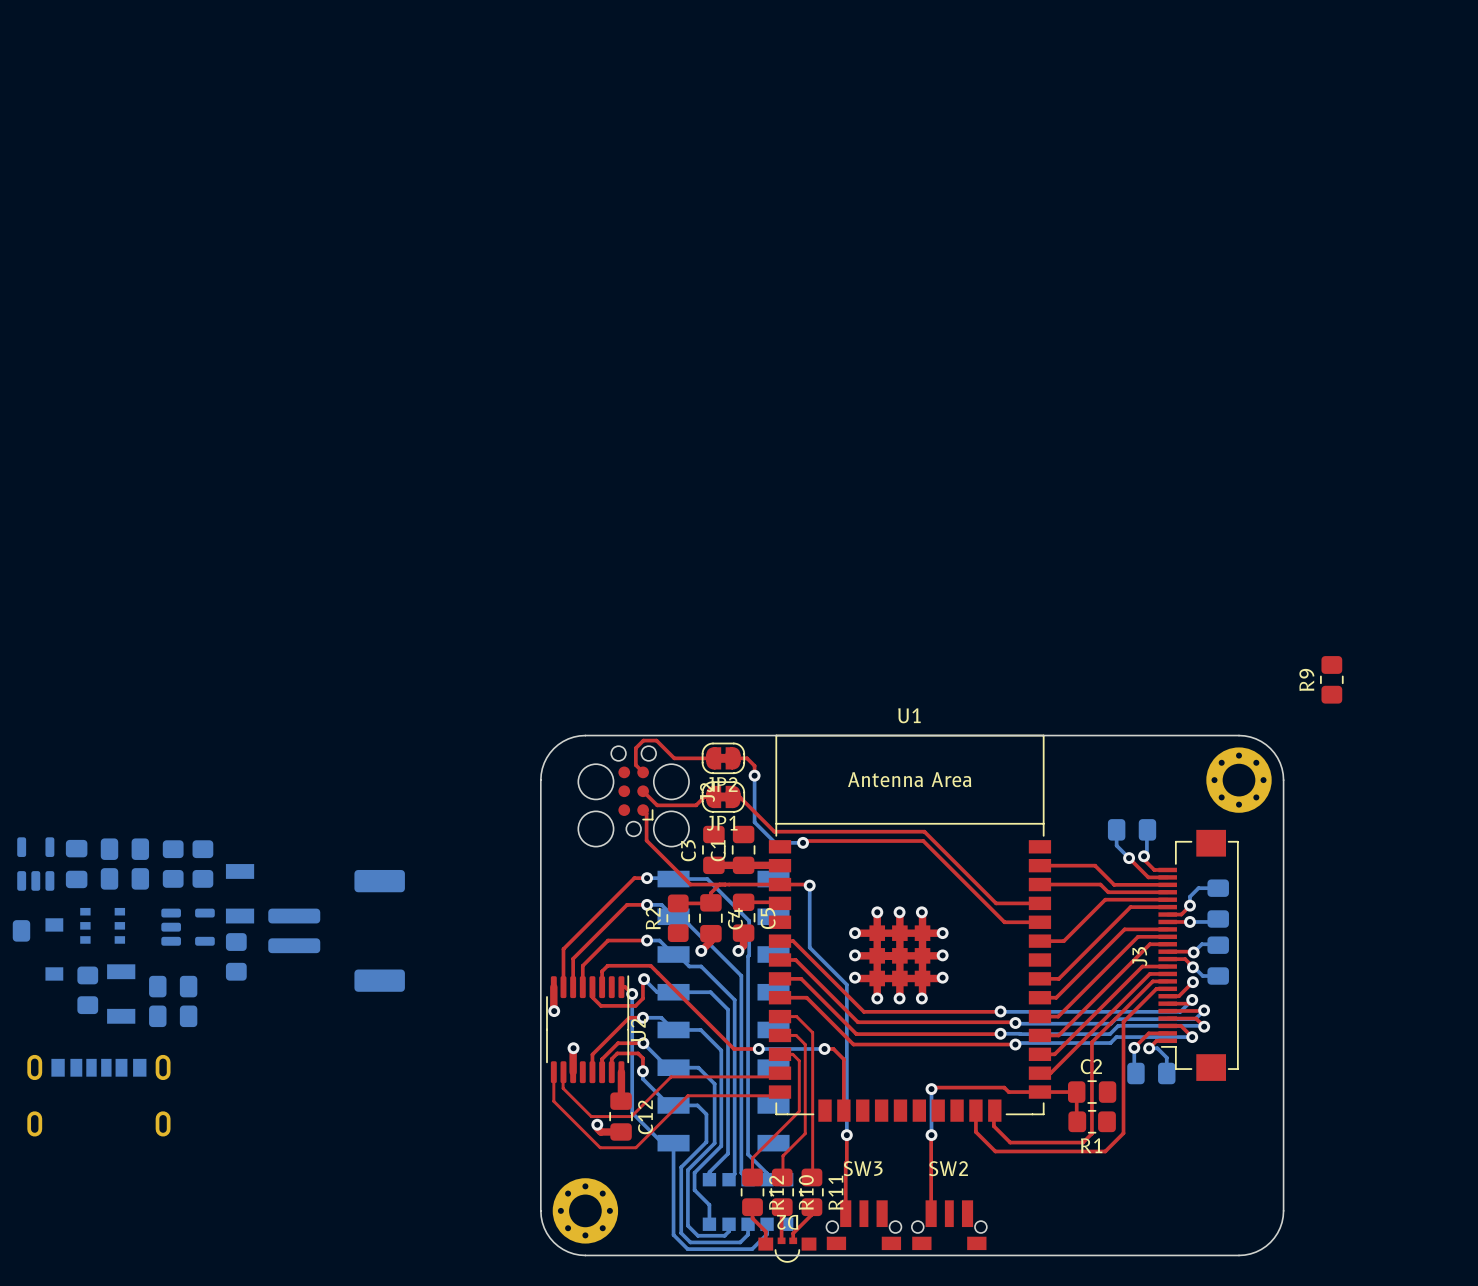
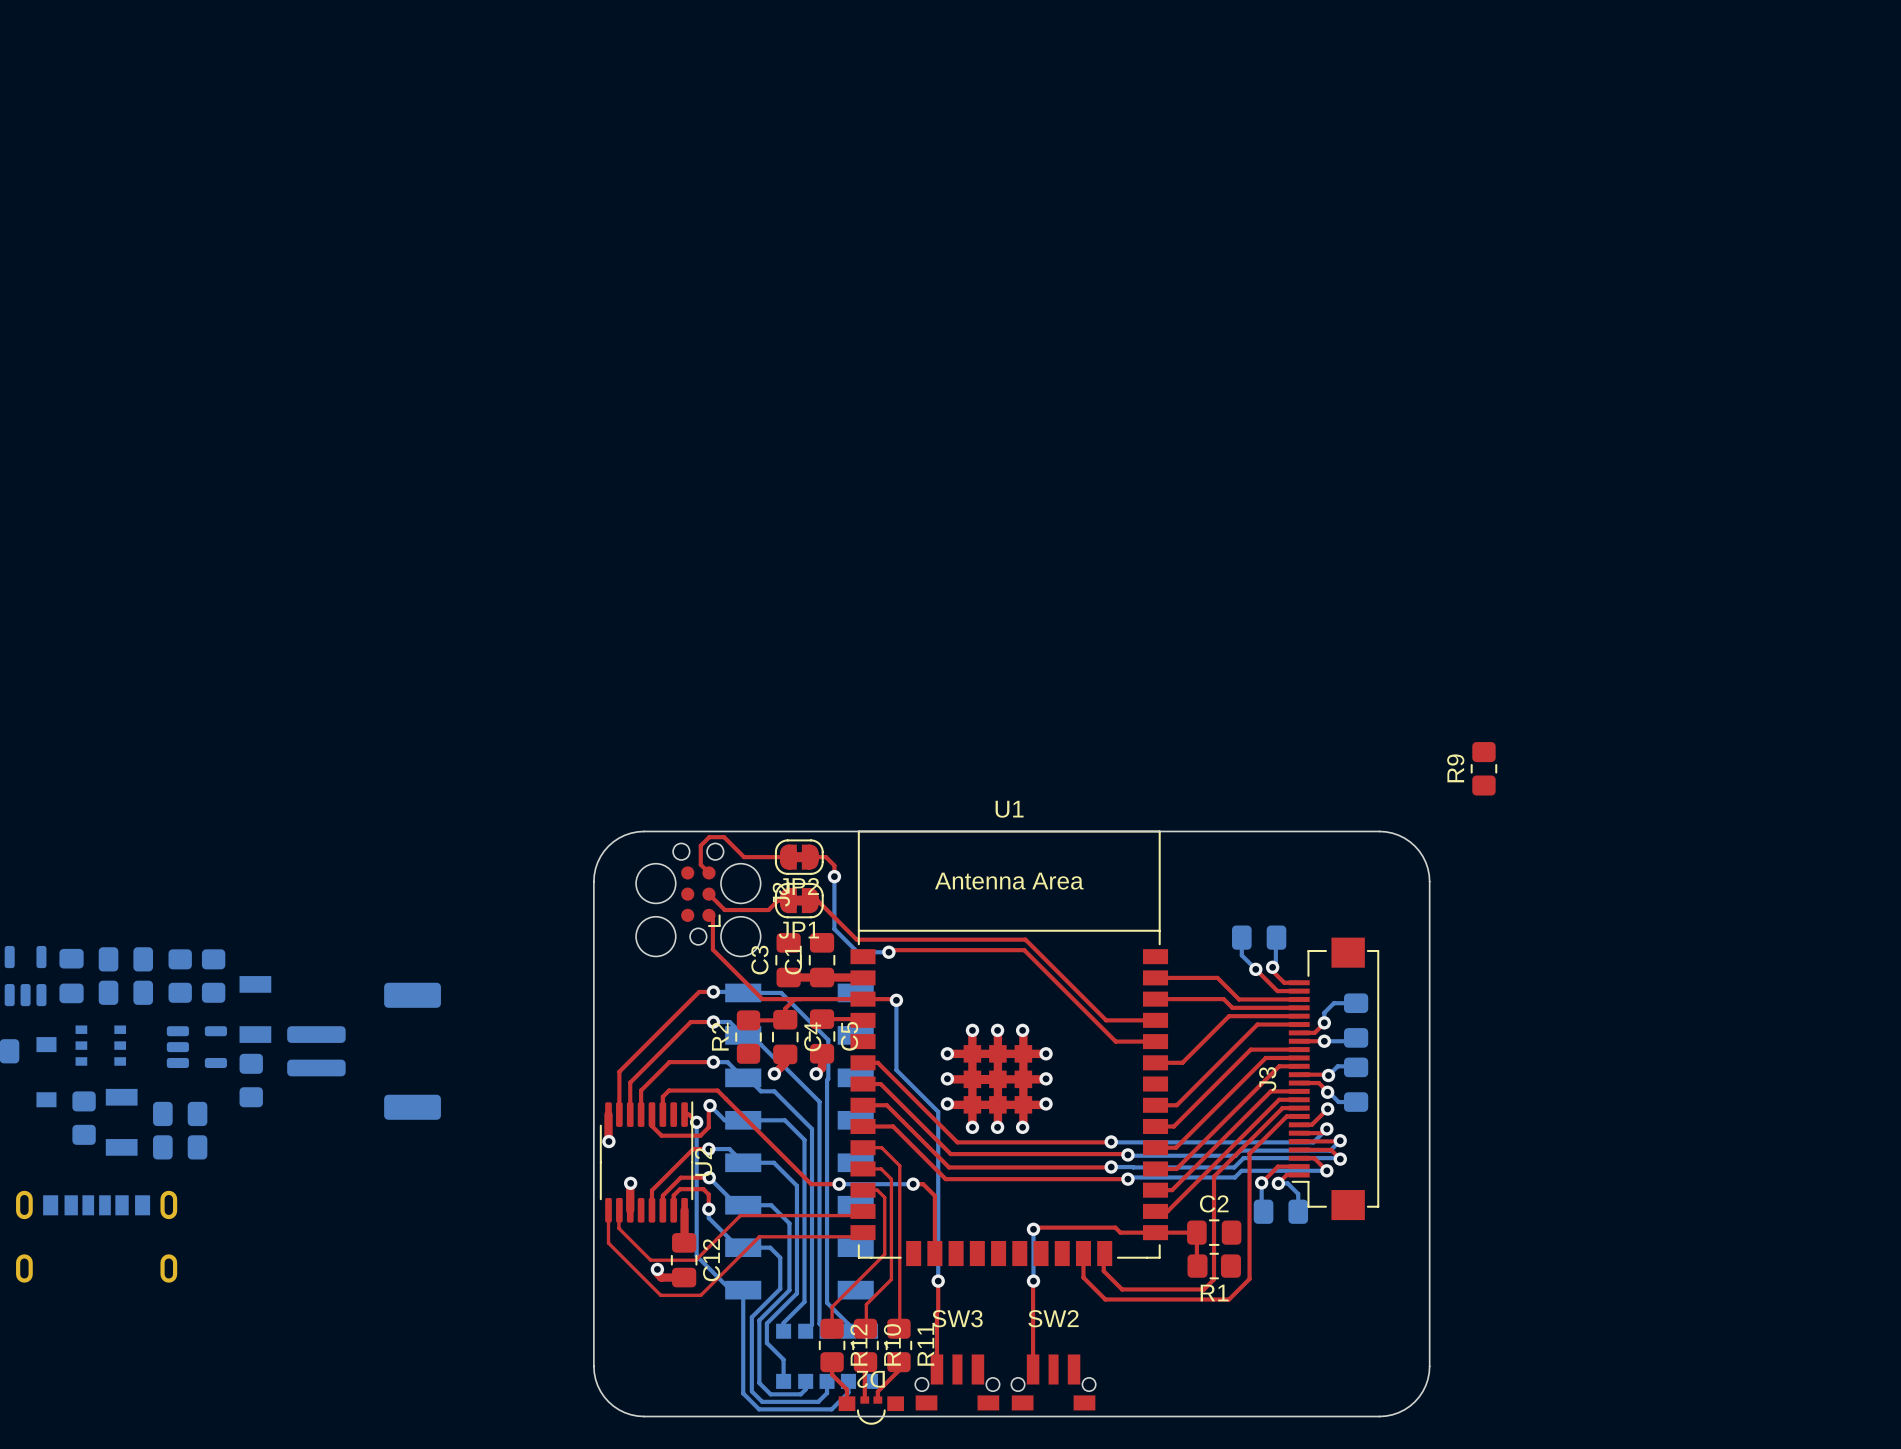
part: (1239, 780) -> none
part: (585, 1210) -> none

